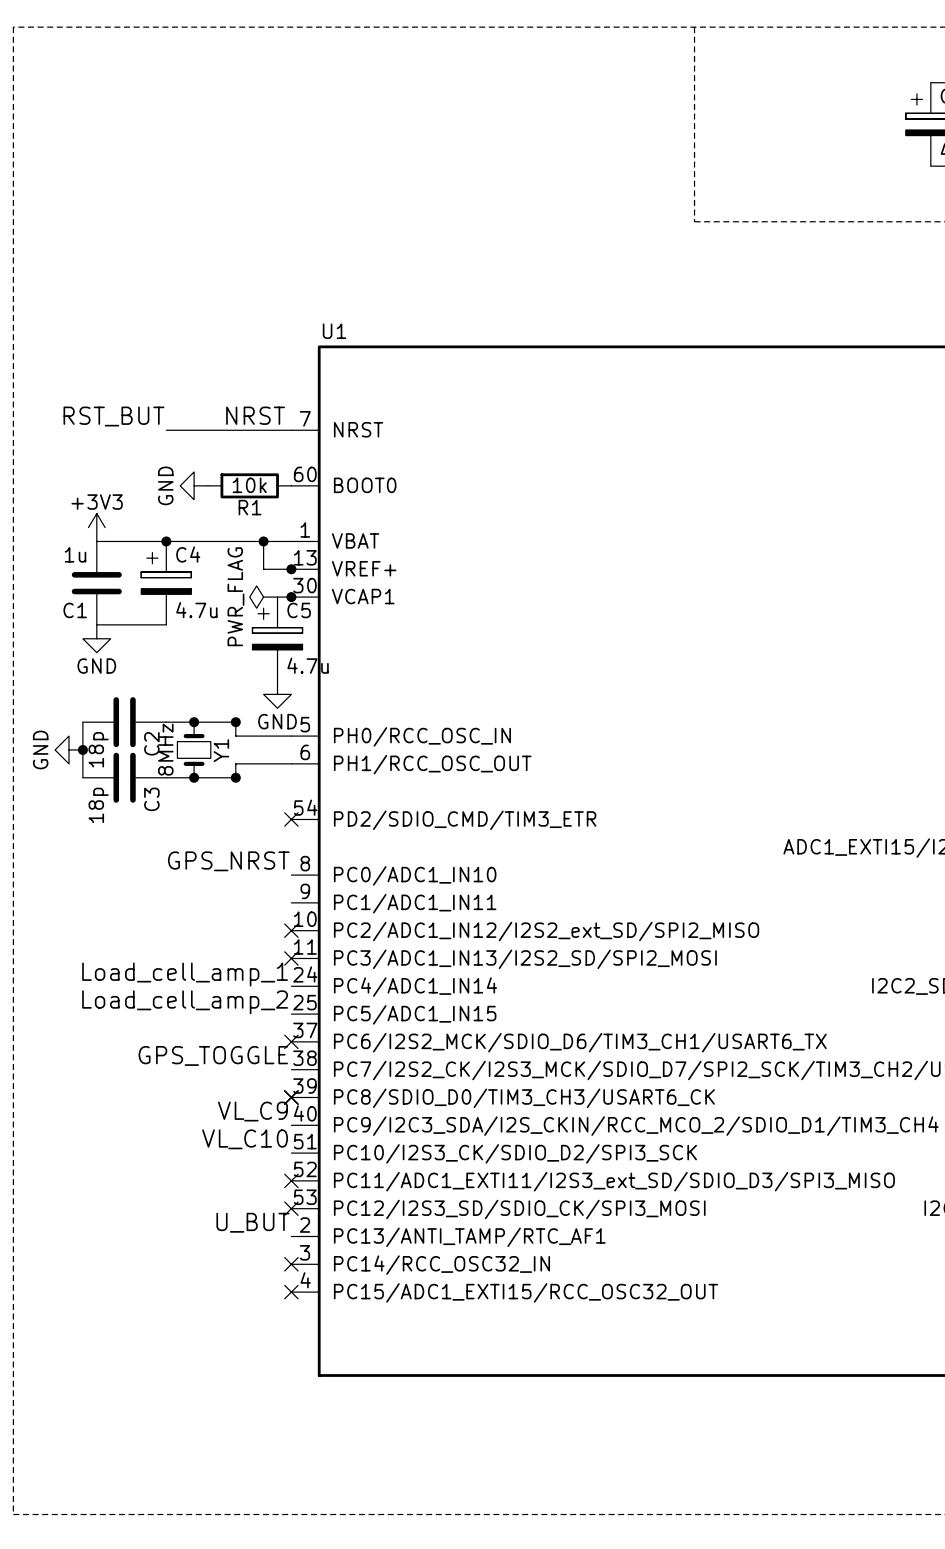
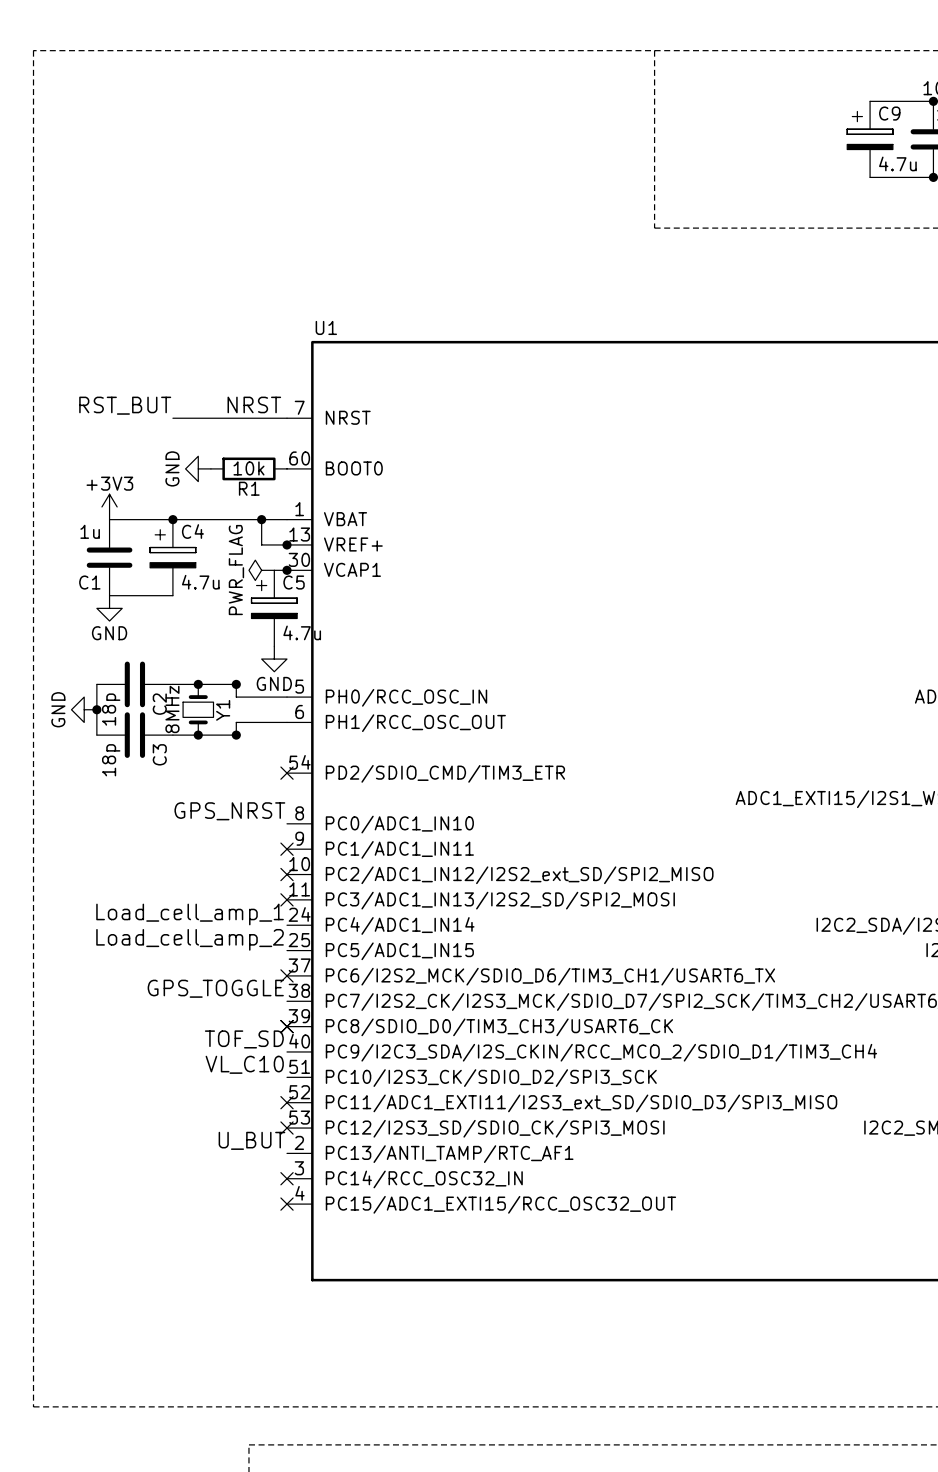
no-connect mark: none -> (287, 849)
label: VL_C9 (252, 1111) -> TOF_SD (244, 1039)

